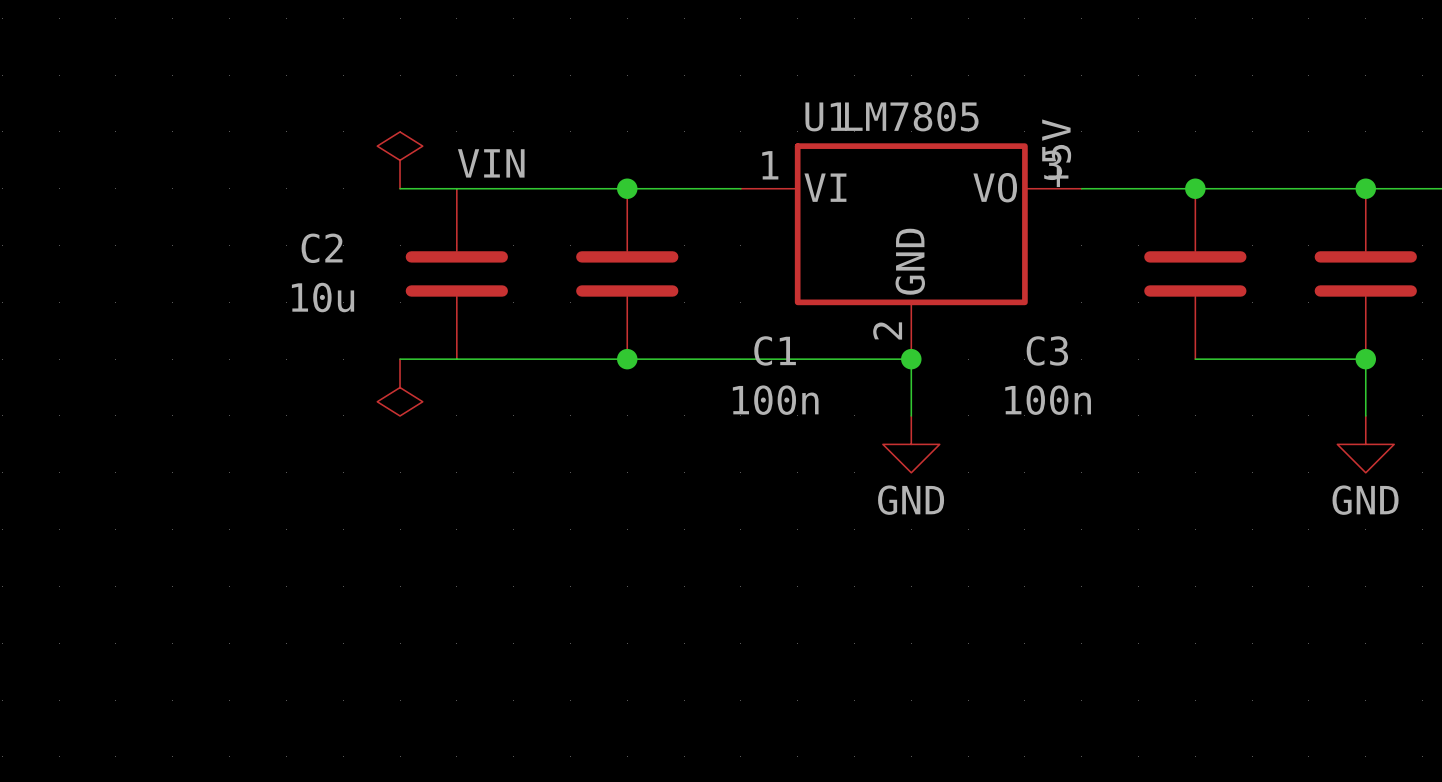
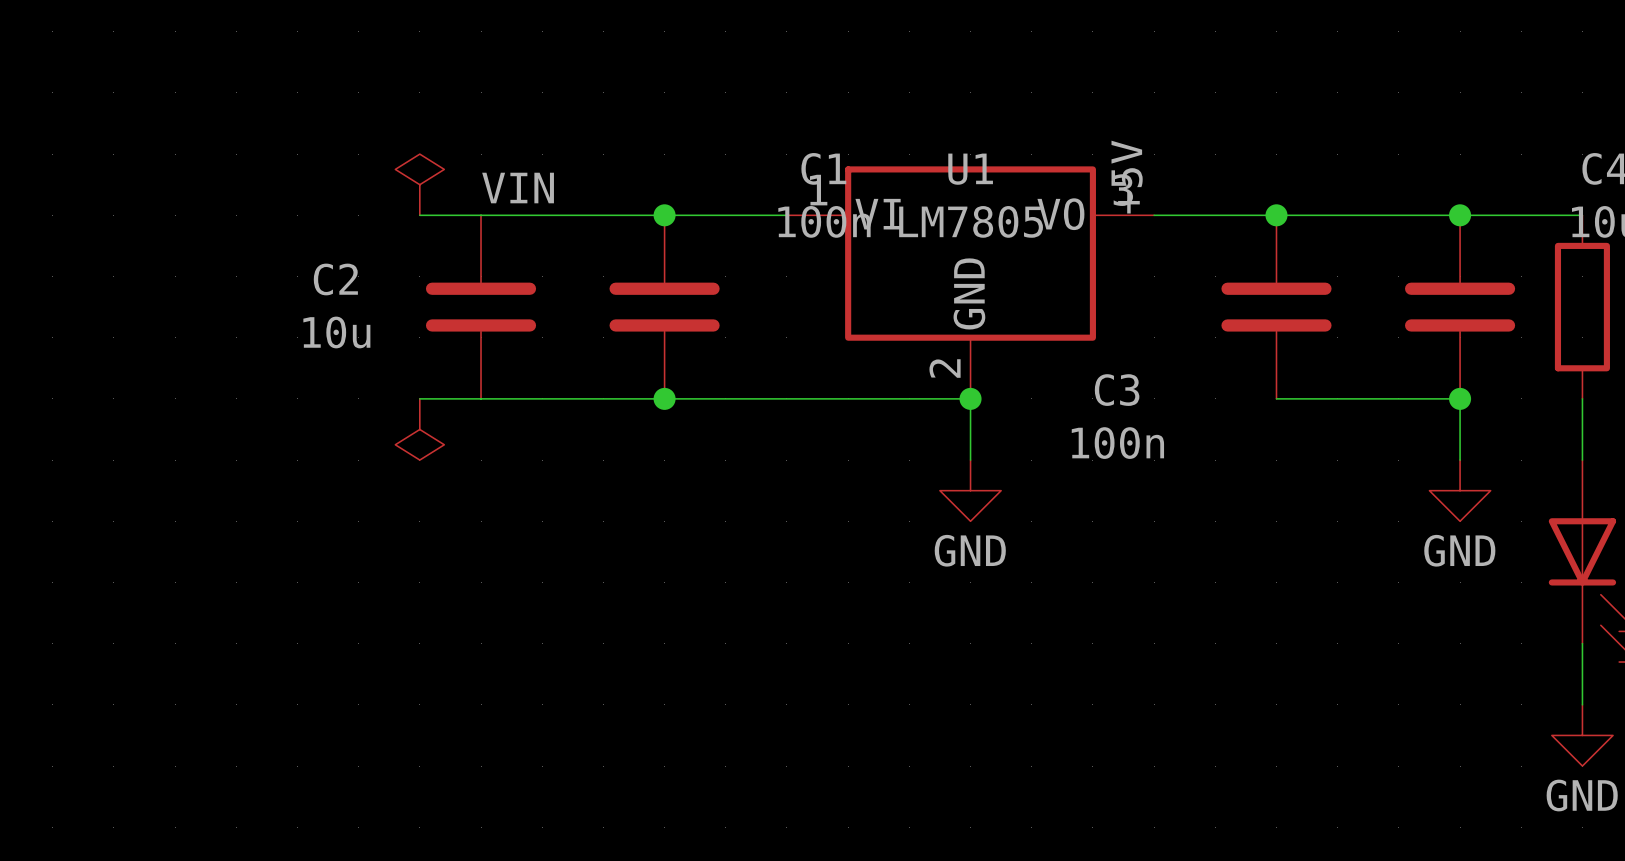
U1 name position: U1 (826, 116) -> U1 (970, 169)
U1 value position: LM7805 (911, 116) -> LM7805 (971, 221)
C1 name position: C1 (775, 350) -> C1 (823, 168)
C1 value position: 100n (775, 400) -> 100n (824, 221)

